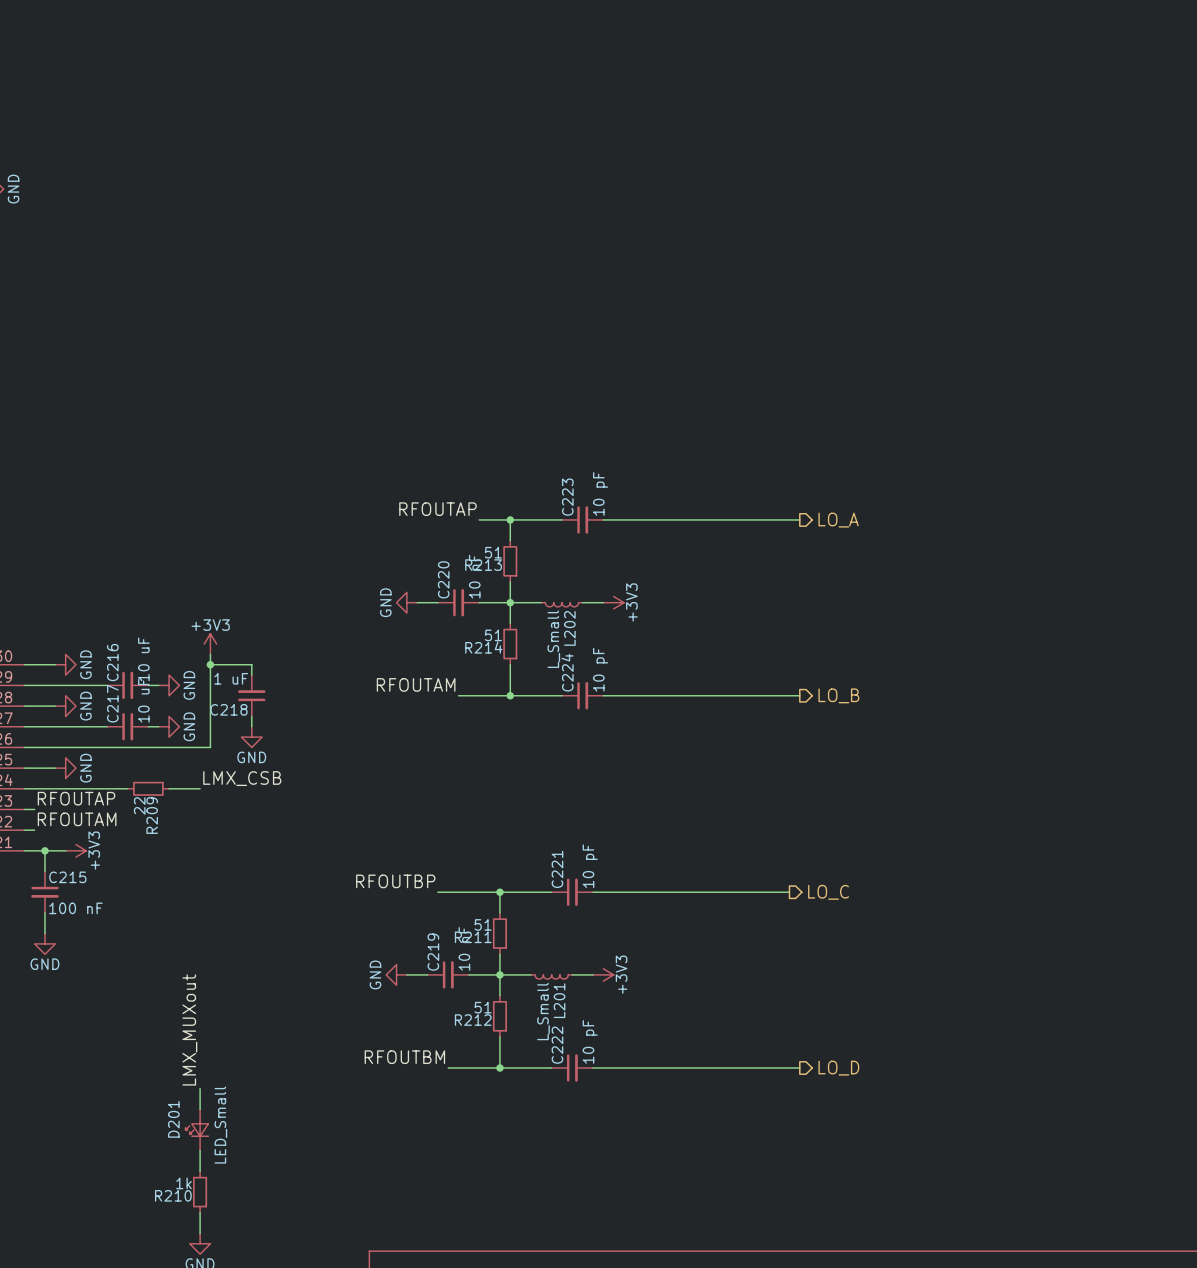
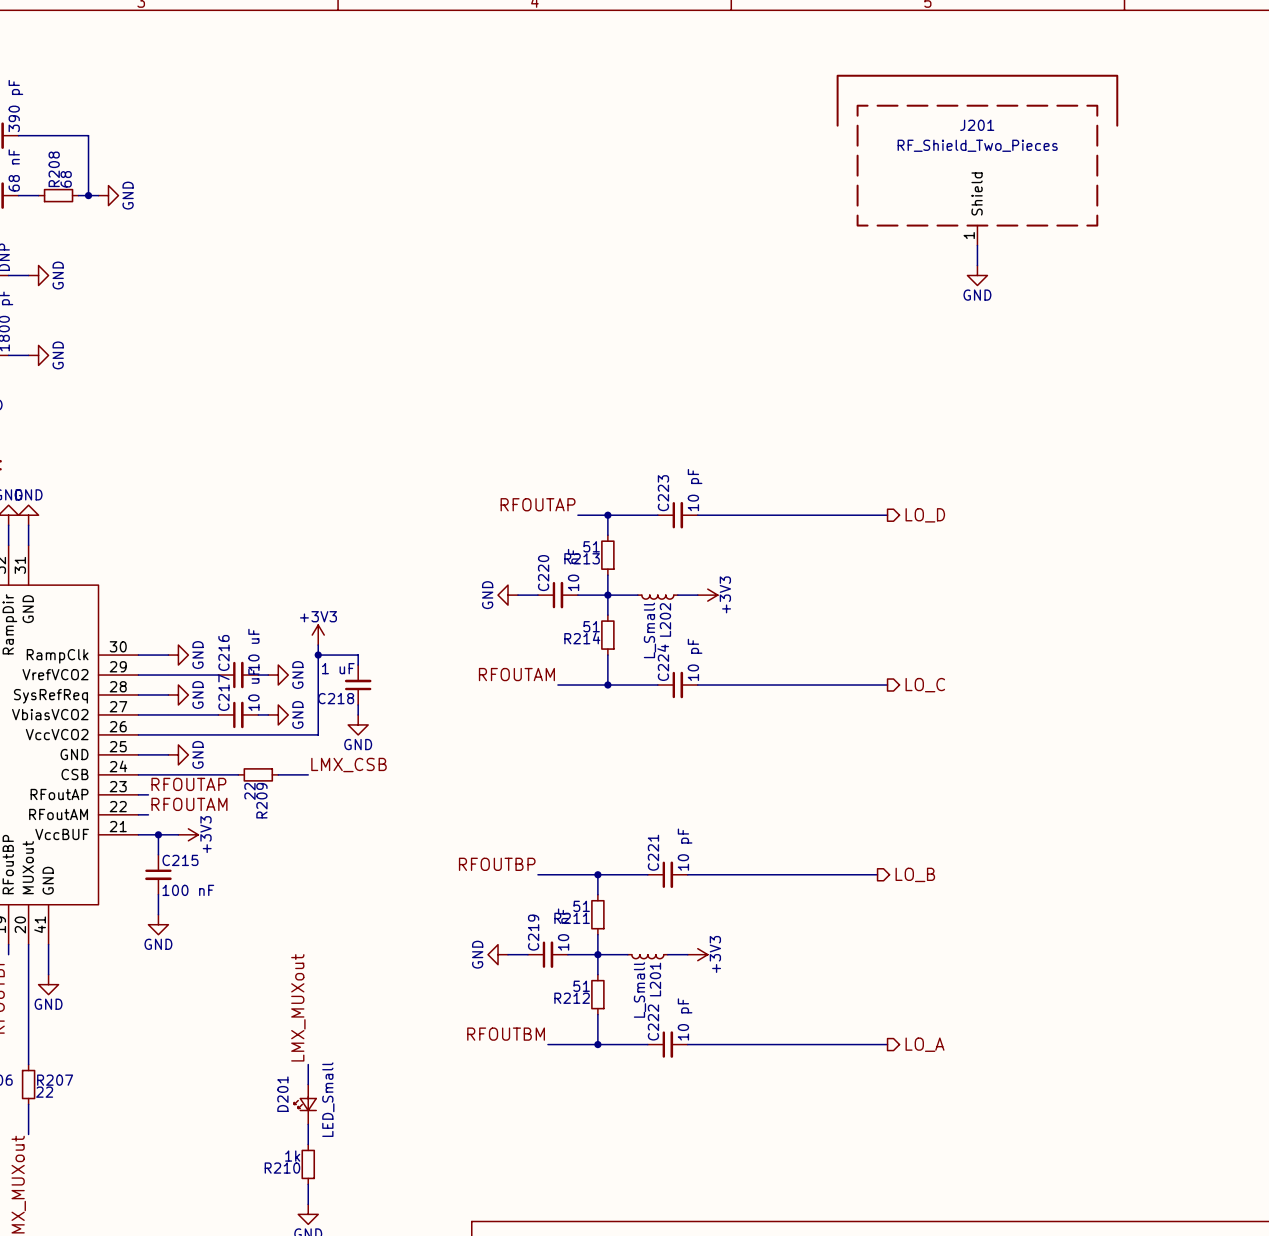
J201: none -> RF_Shield_Two_Pieces (977, 160)
wire: none -> (977, 245) (977, 265)
power symbol: none -> GND (977, 275)
hierarchical label: LO_A (838, 520) -> LO_D (925, 515)
hierarchical label: LO_B (838, 695) -> LO_C (925, 685)
hierarchical label: LO_C (828, 892) -> LO_B (915, 874)
hierarchical label: LO_D (838, 1068) -> LO_A (925, 1044)

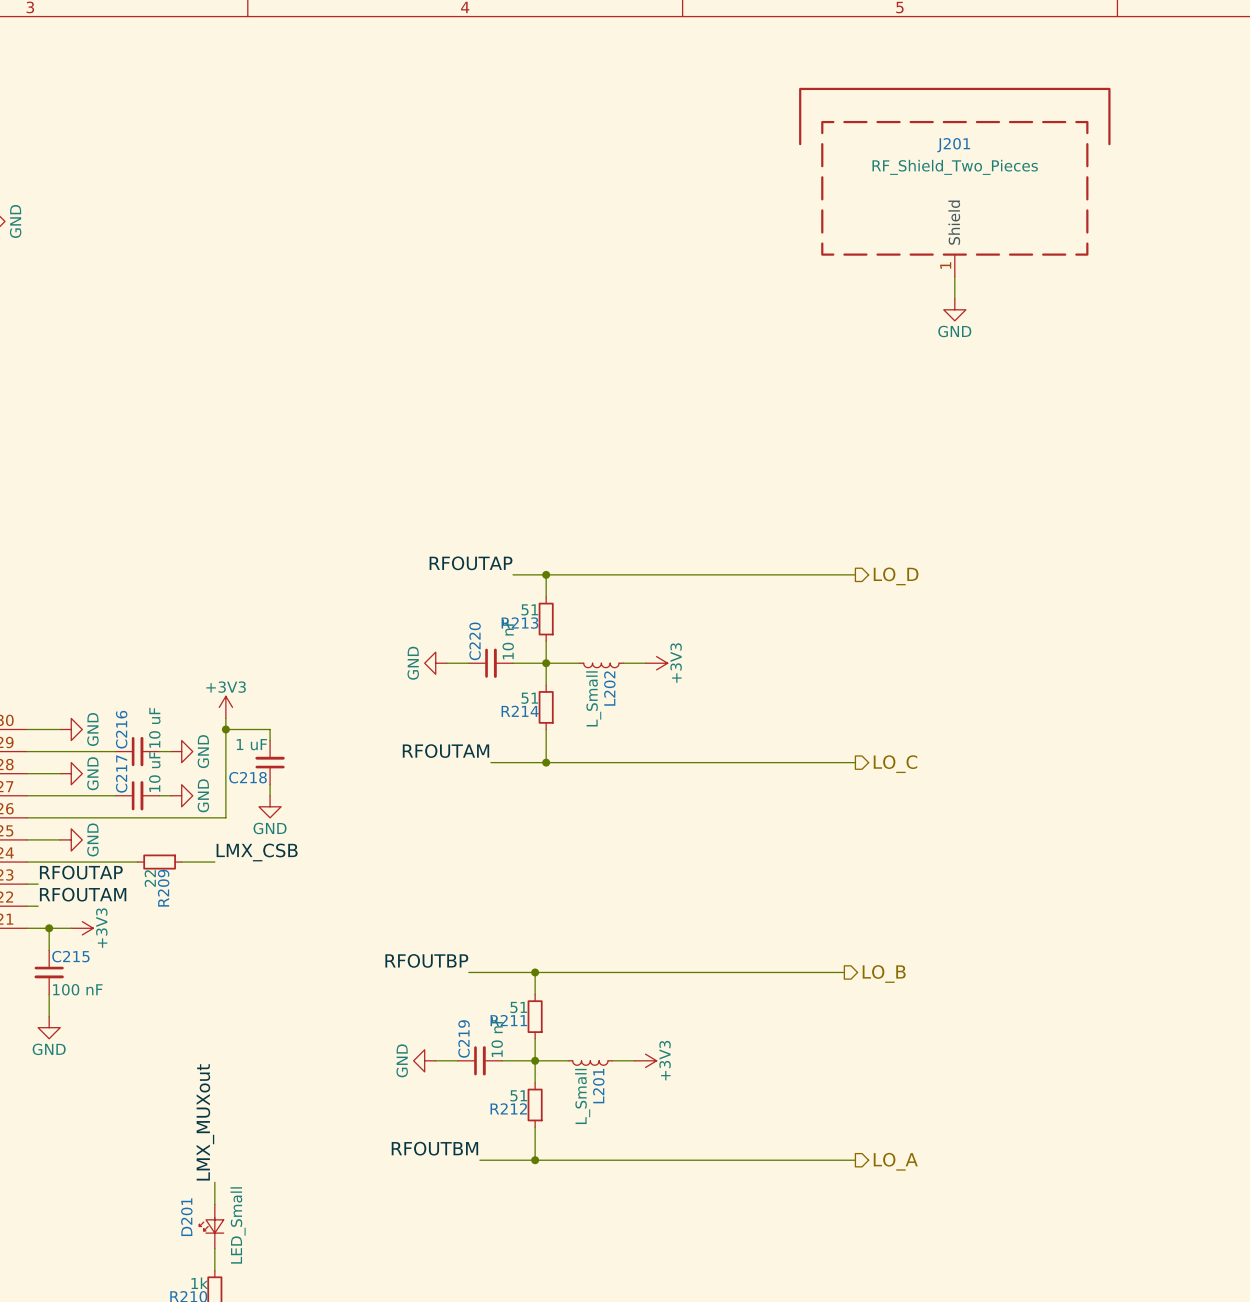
C223: 10 pF (677, 515) -> none
C224: 10 pF (677, 685) -> none
C221: 10 pF (667, 874) -> none
C222: 10 pF (667, 1044) -> none

